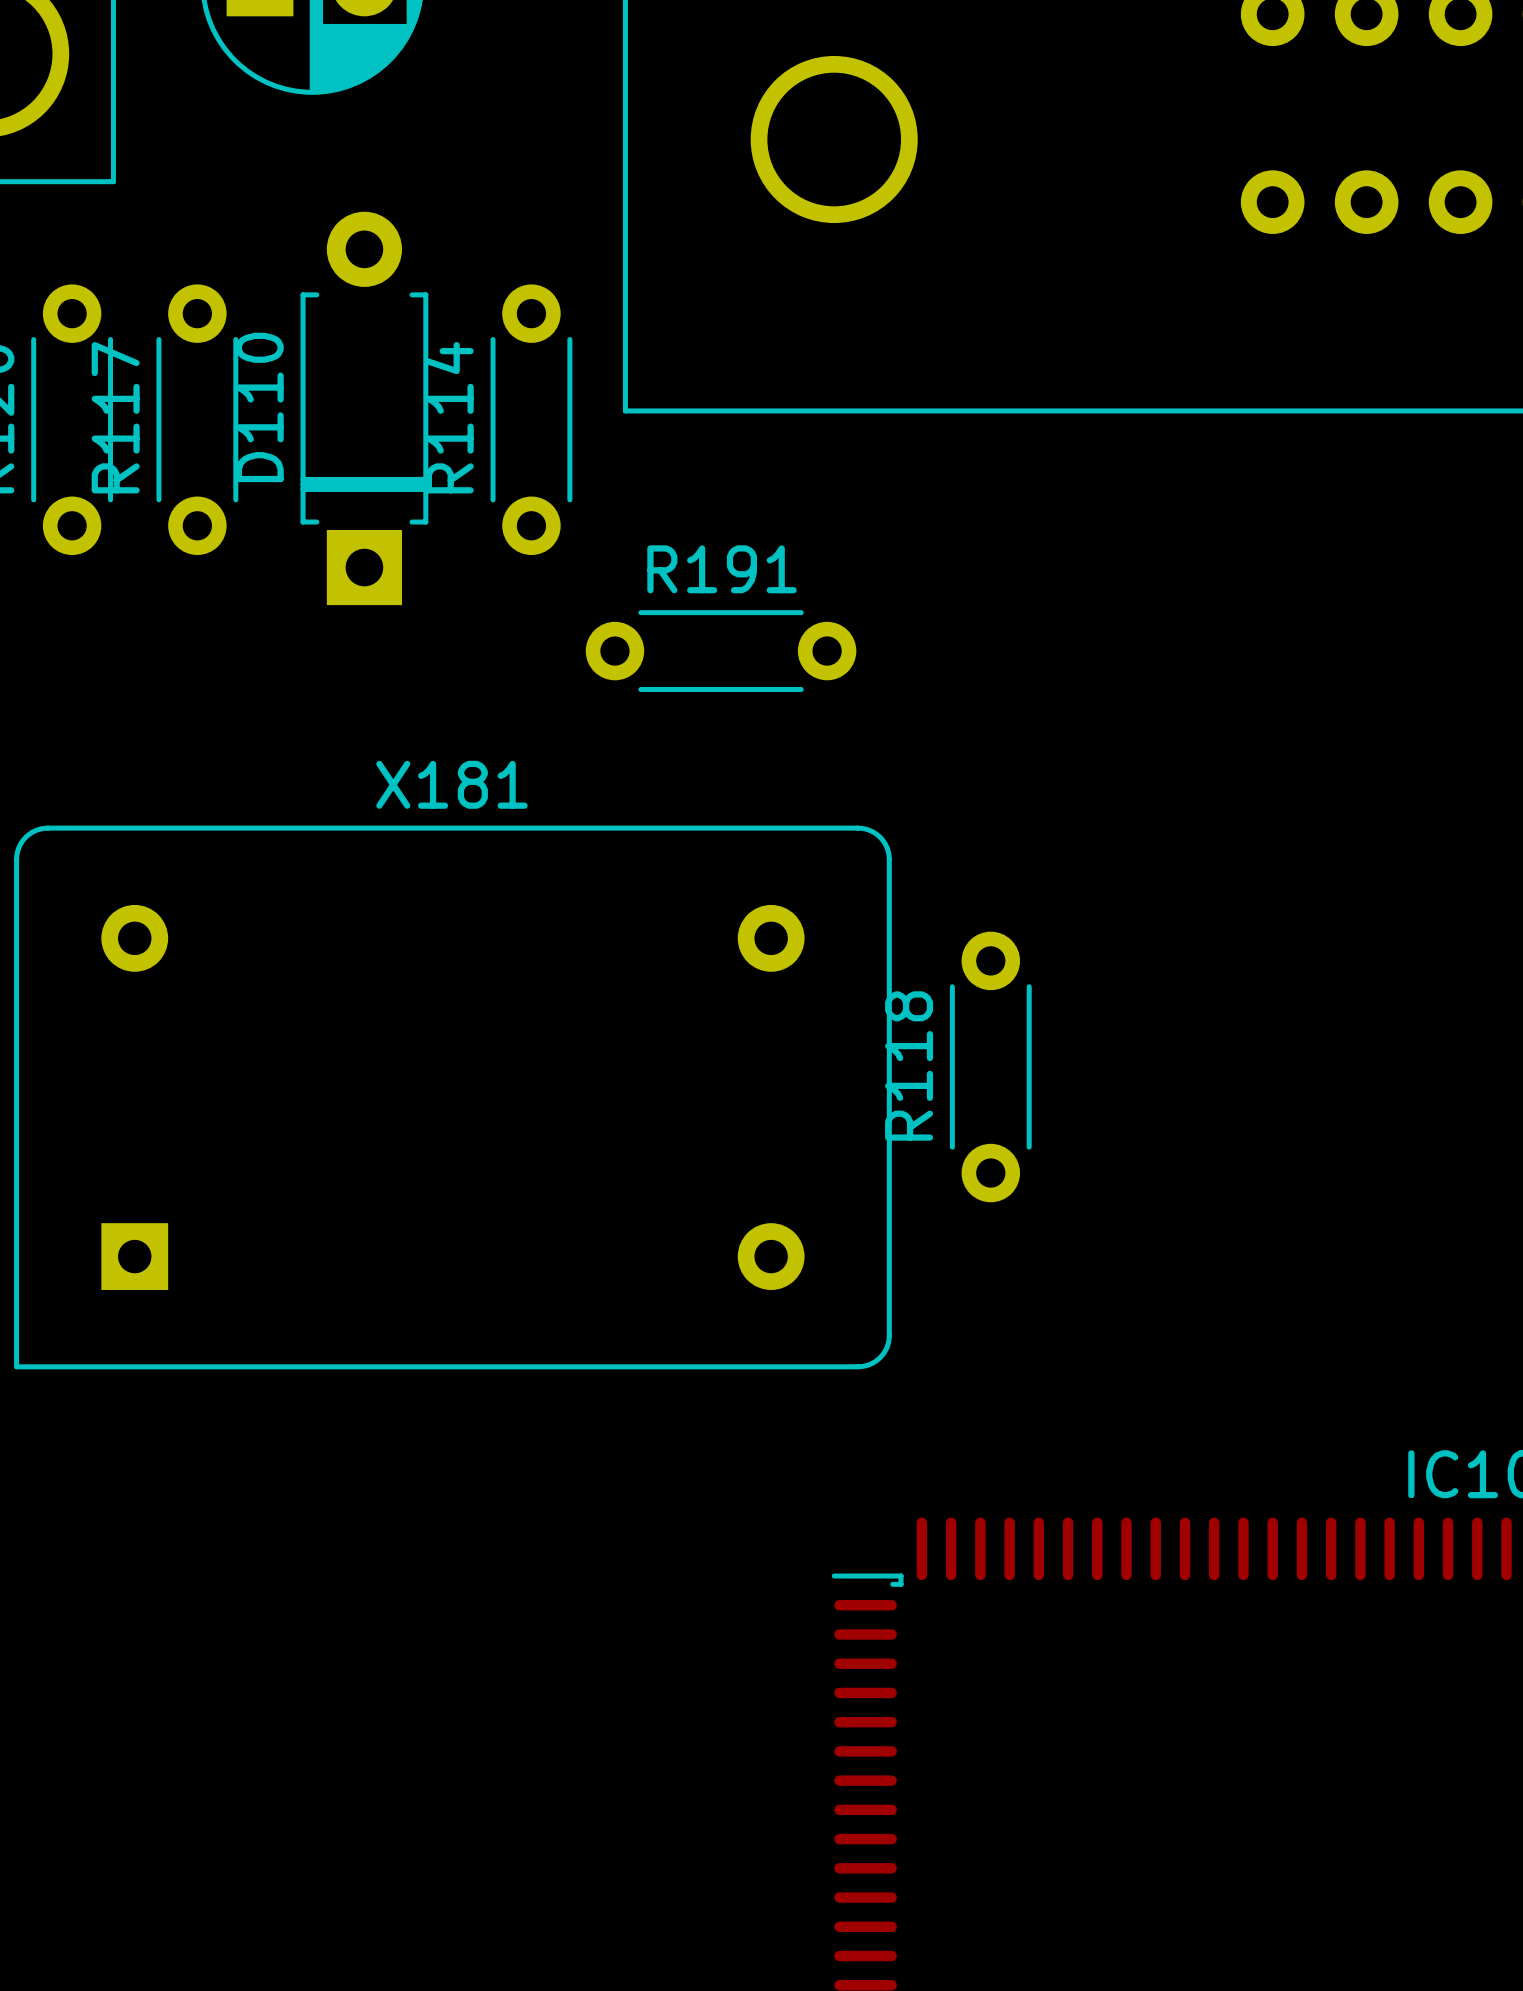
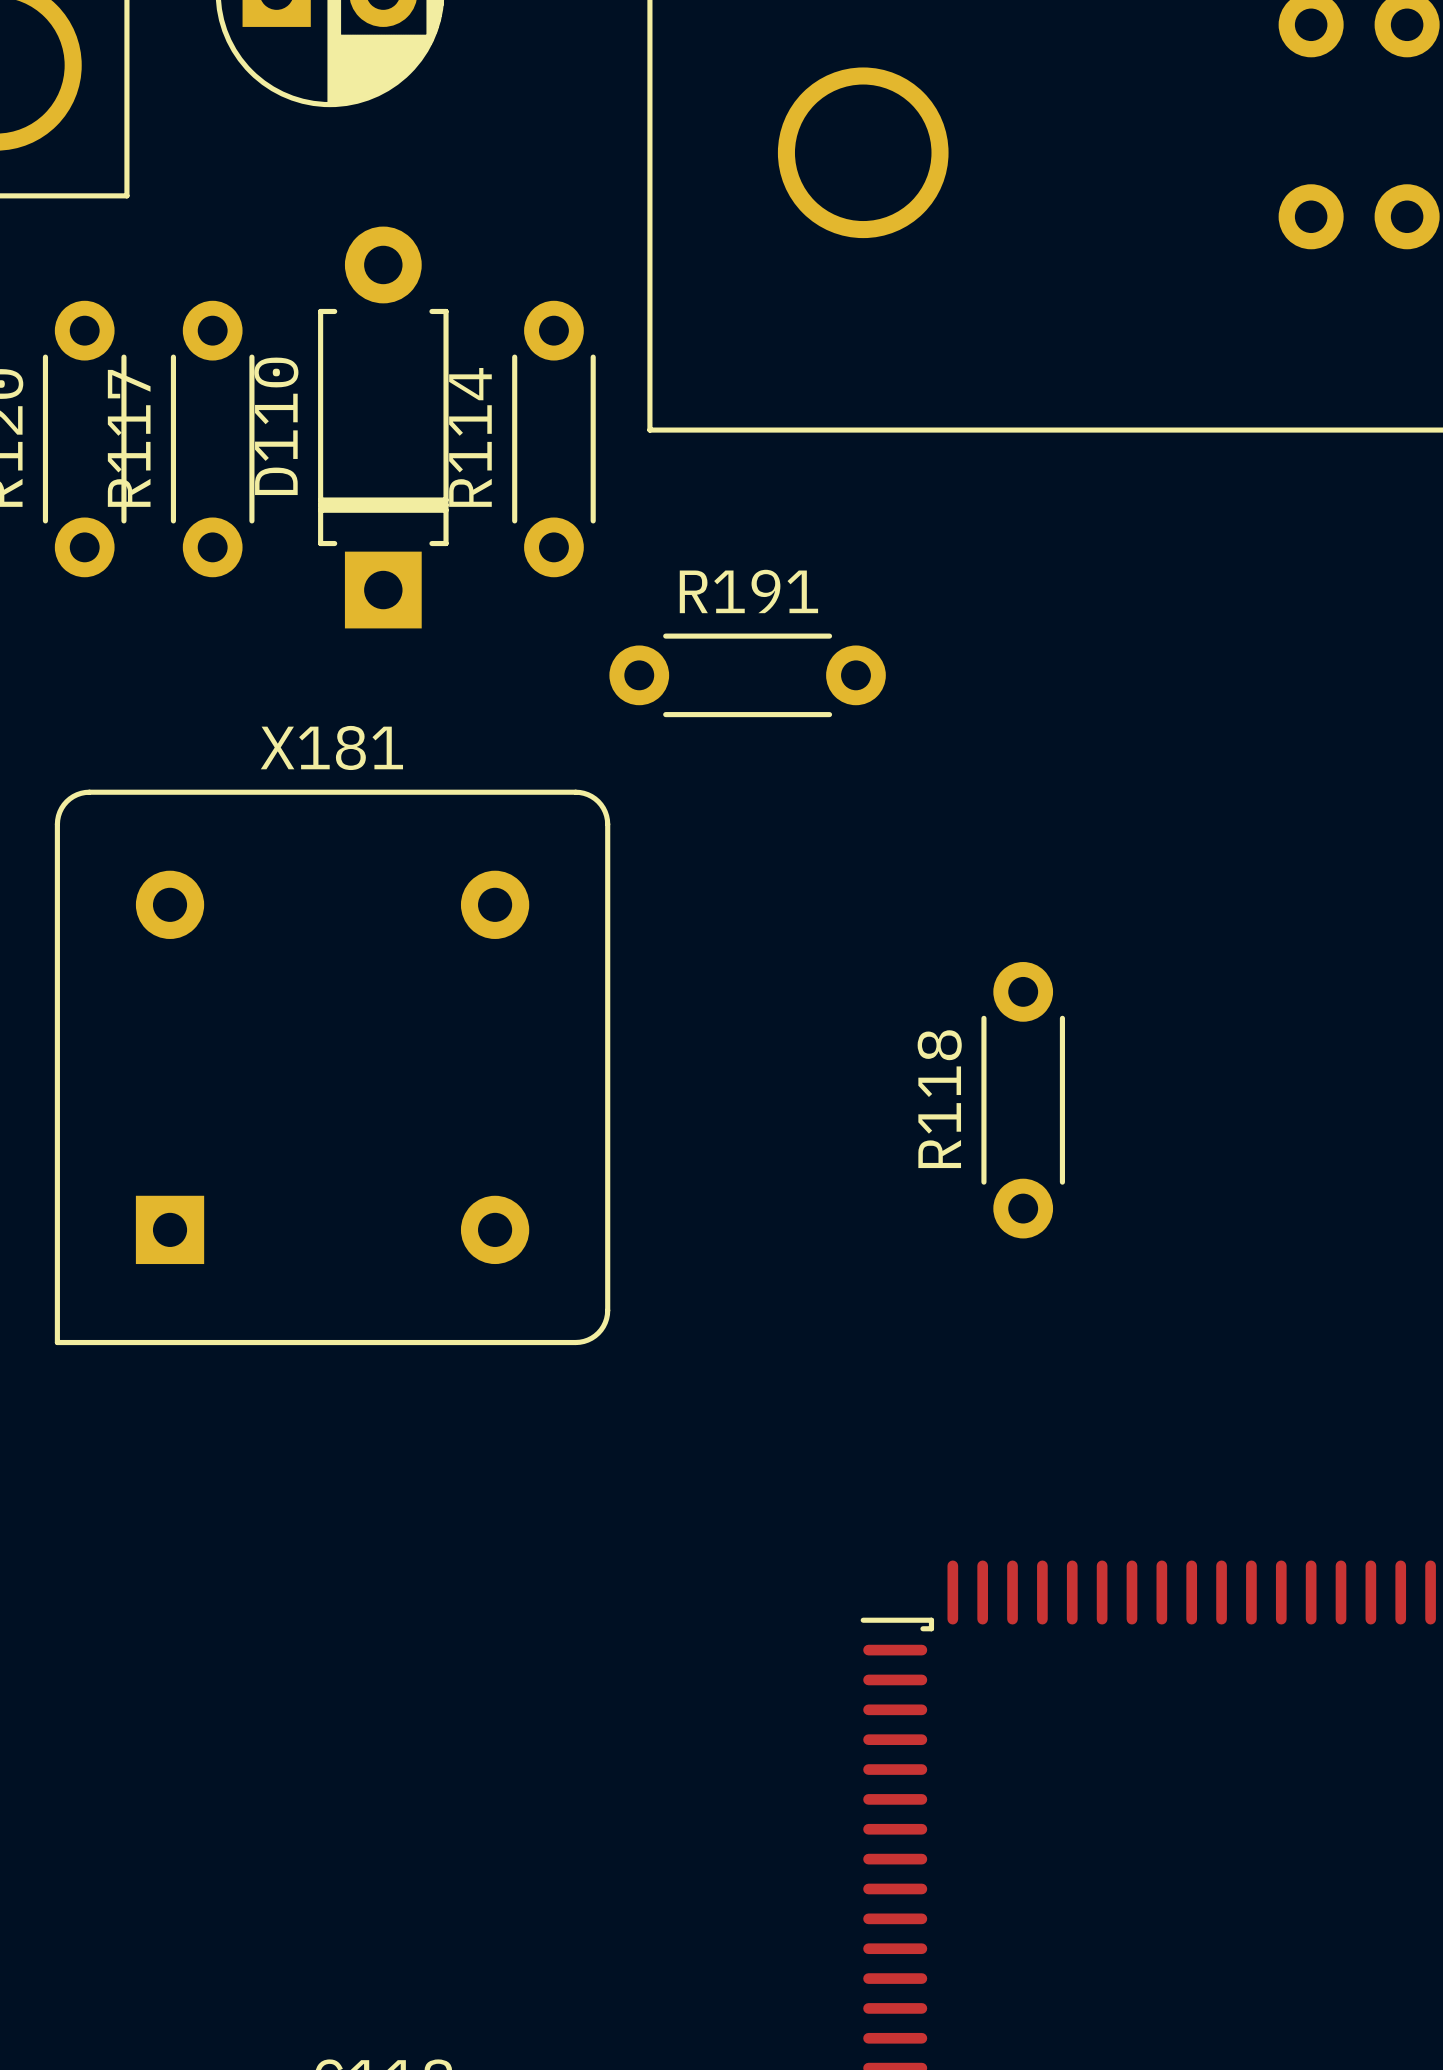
X181 footprint: [14, 825, 892, 1370] -> [54, 789, 611, 1346]

